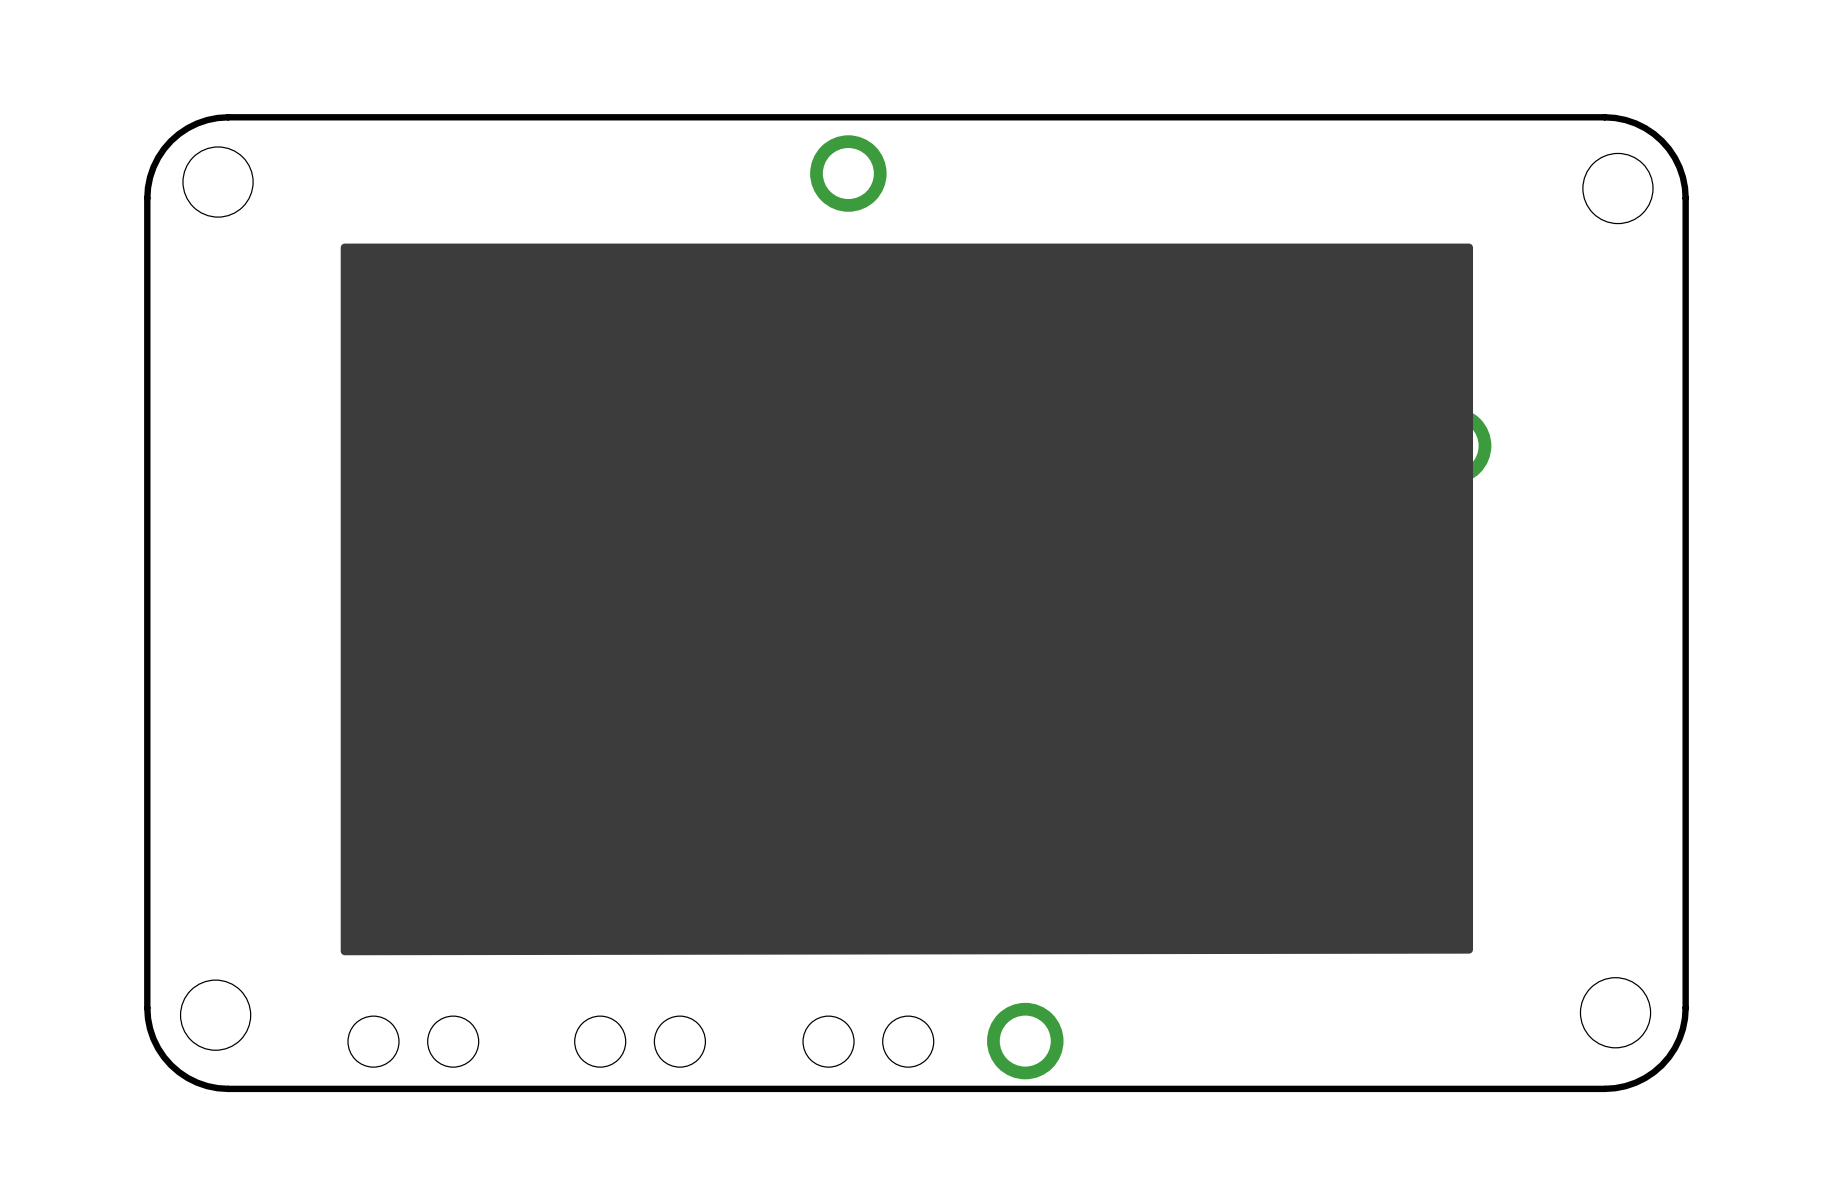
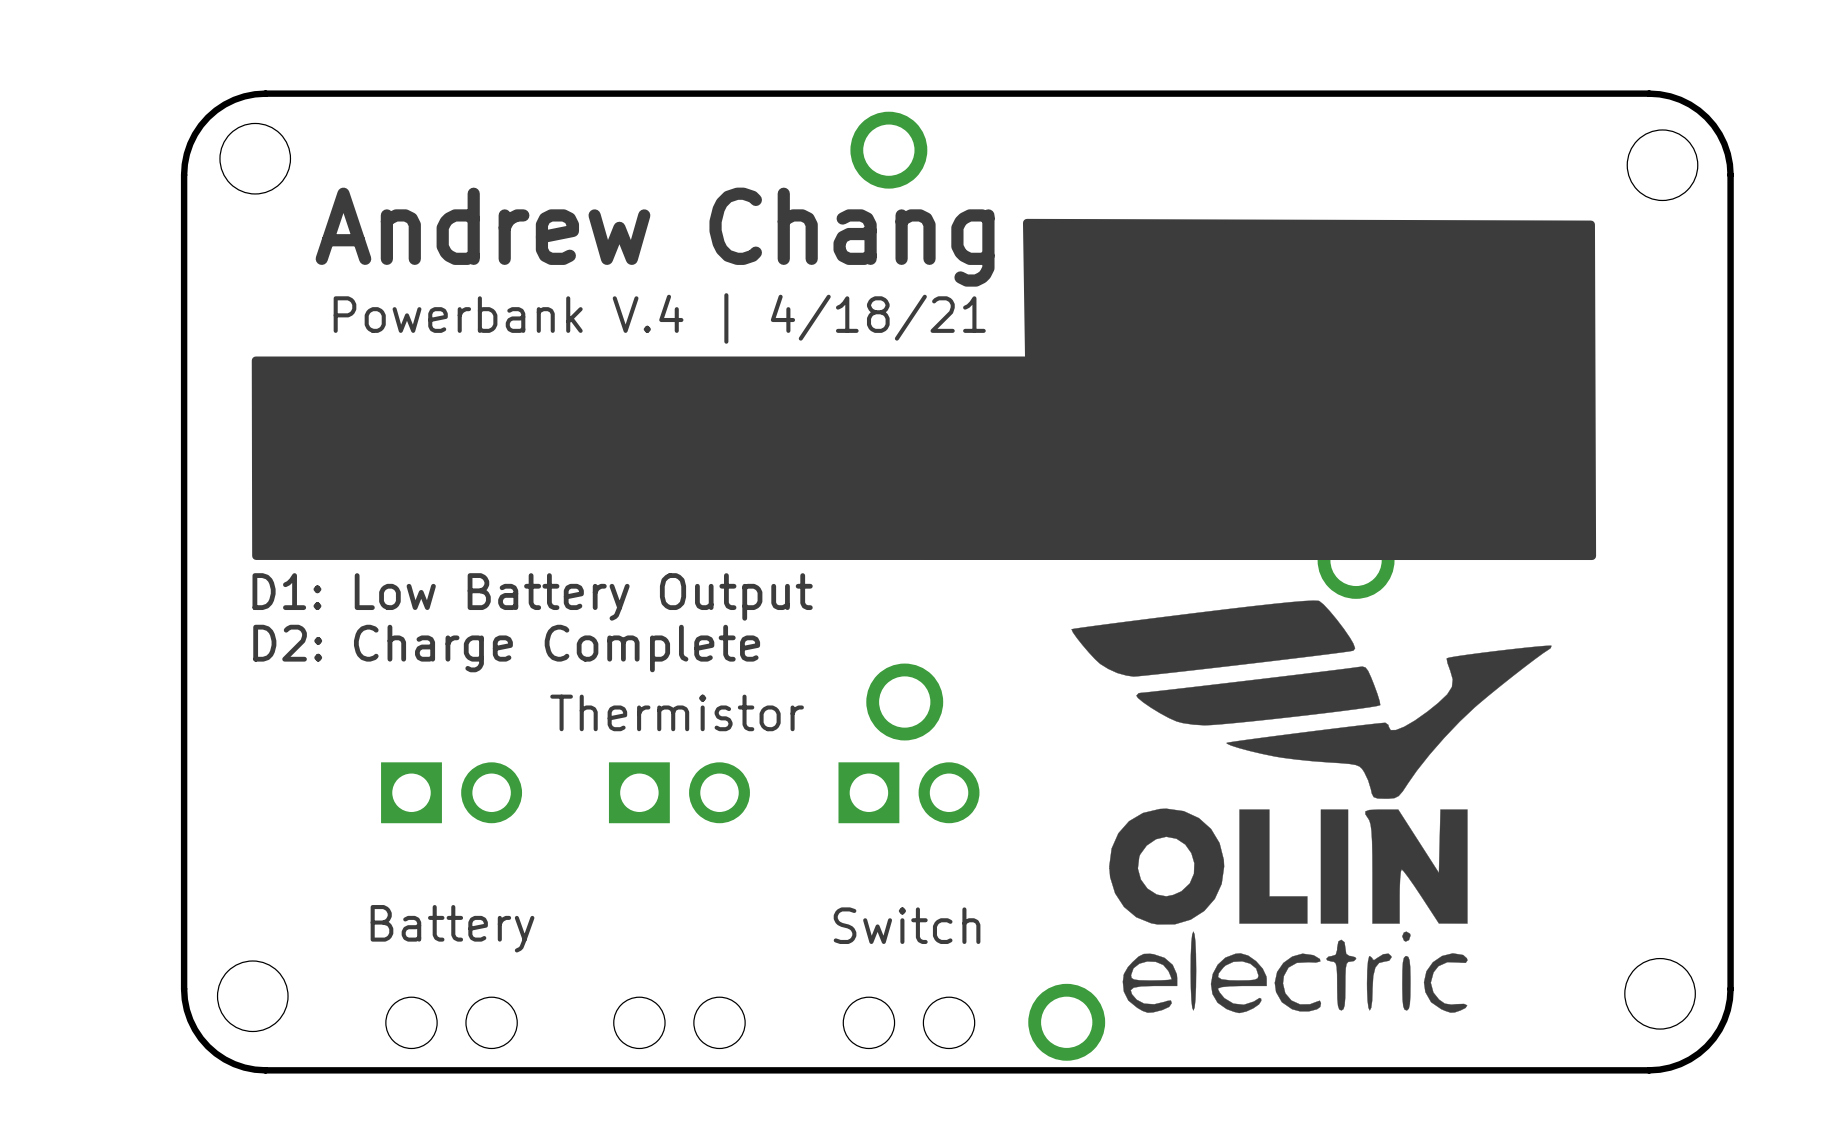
drawing: none -> [251, 218, 1597, 561]
drawing: [340, 243, 1474, 956] -> none
text: none -> Andrew Chang (655, 237)
text: none -> Powerbank V.4 | 4/18/21 (659, 318)
text: none -> D1: Low Battery Output (532, 596)
drawing: none -> [1071, 600, 1552, 1014]
text: none -> D2: Charge Complete (506, 648)
text: none -> Thermistor (677, 712)
text: none -> Switch (907, 925)
text: none -> Battery (452, 928)

